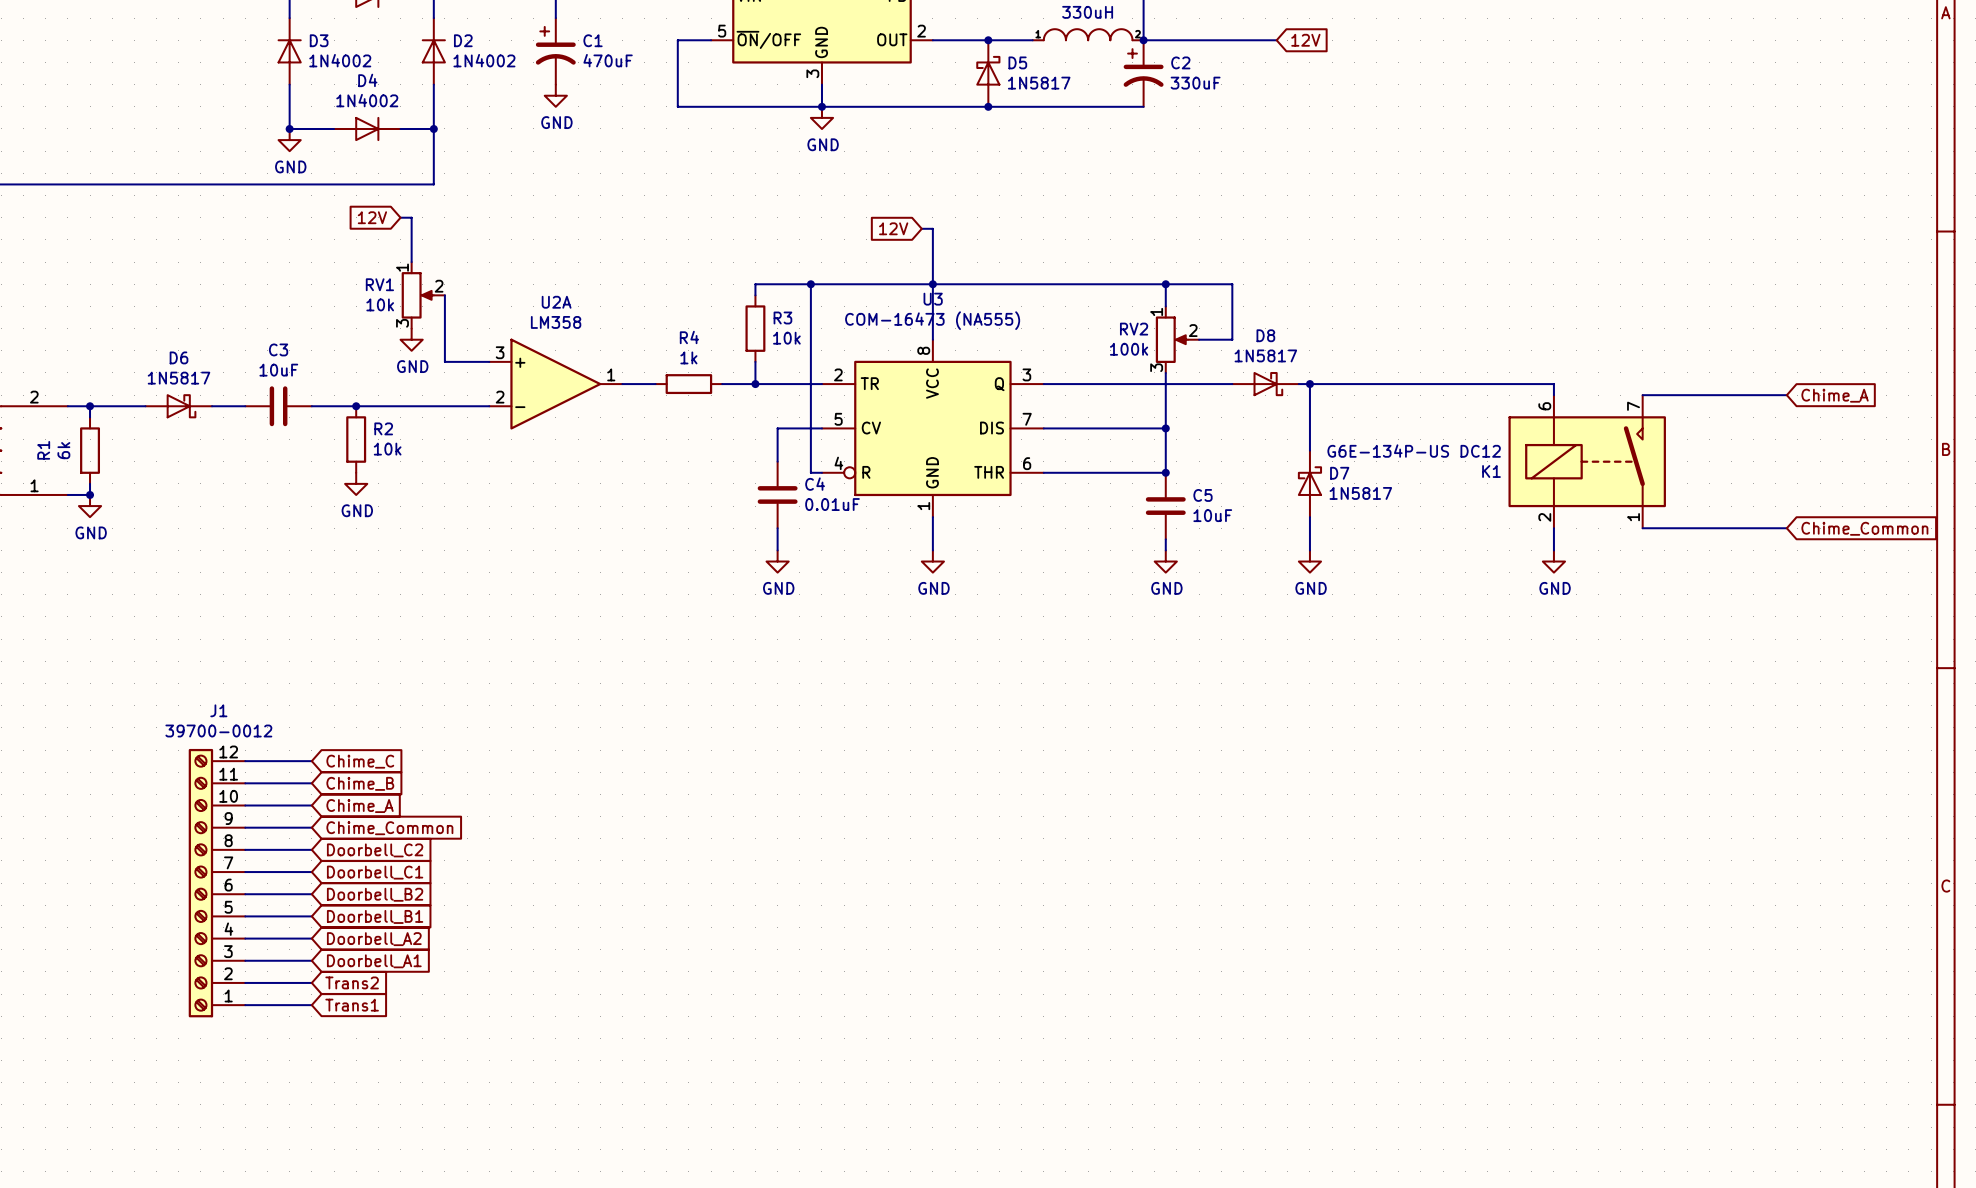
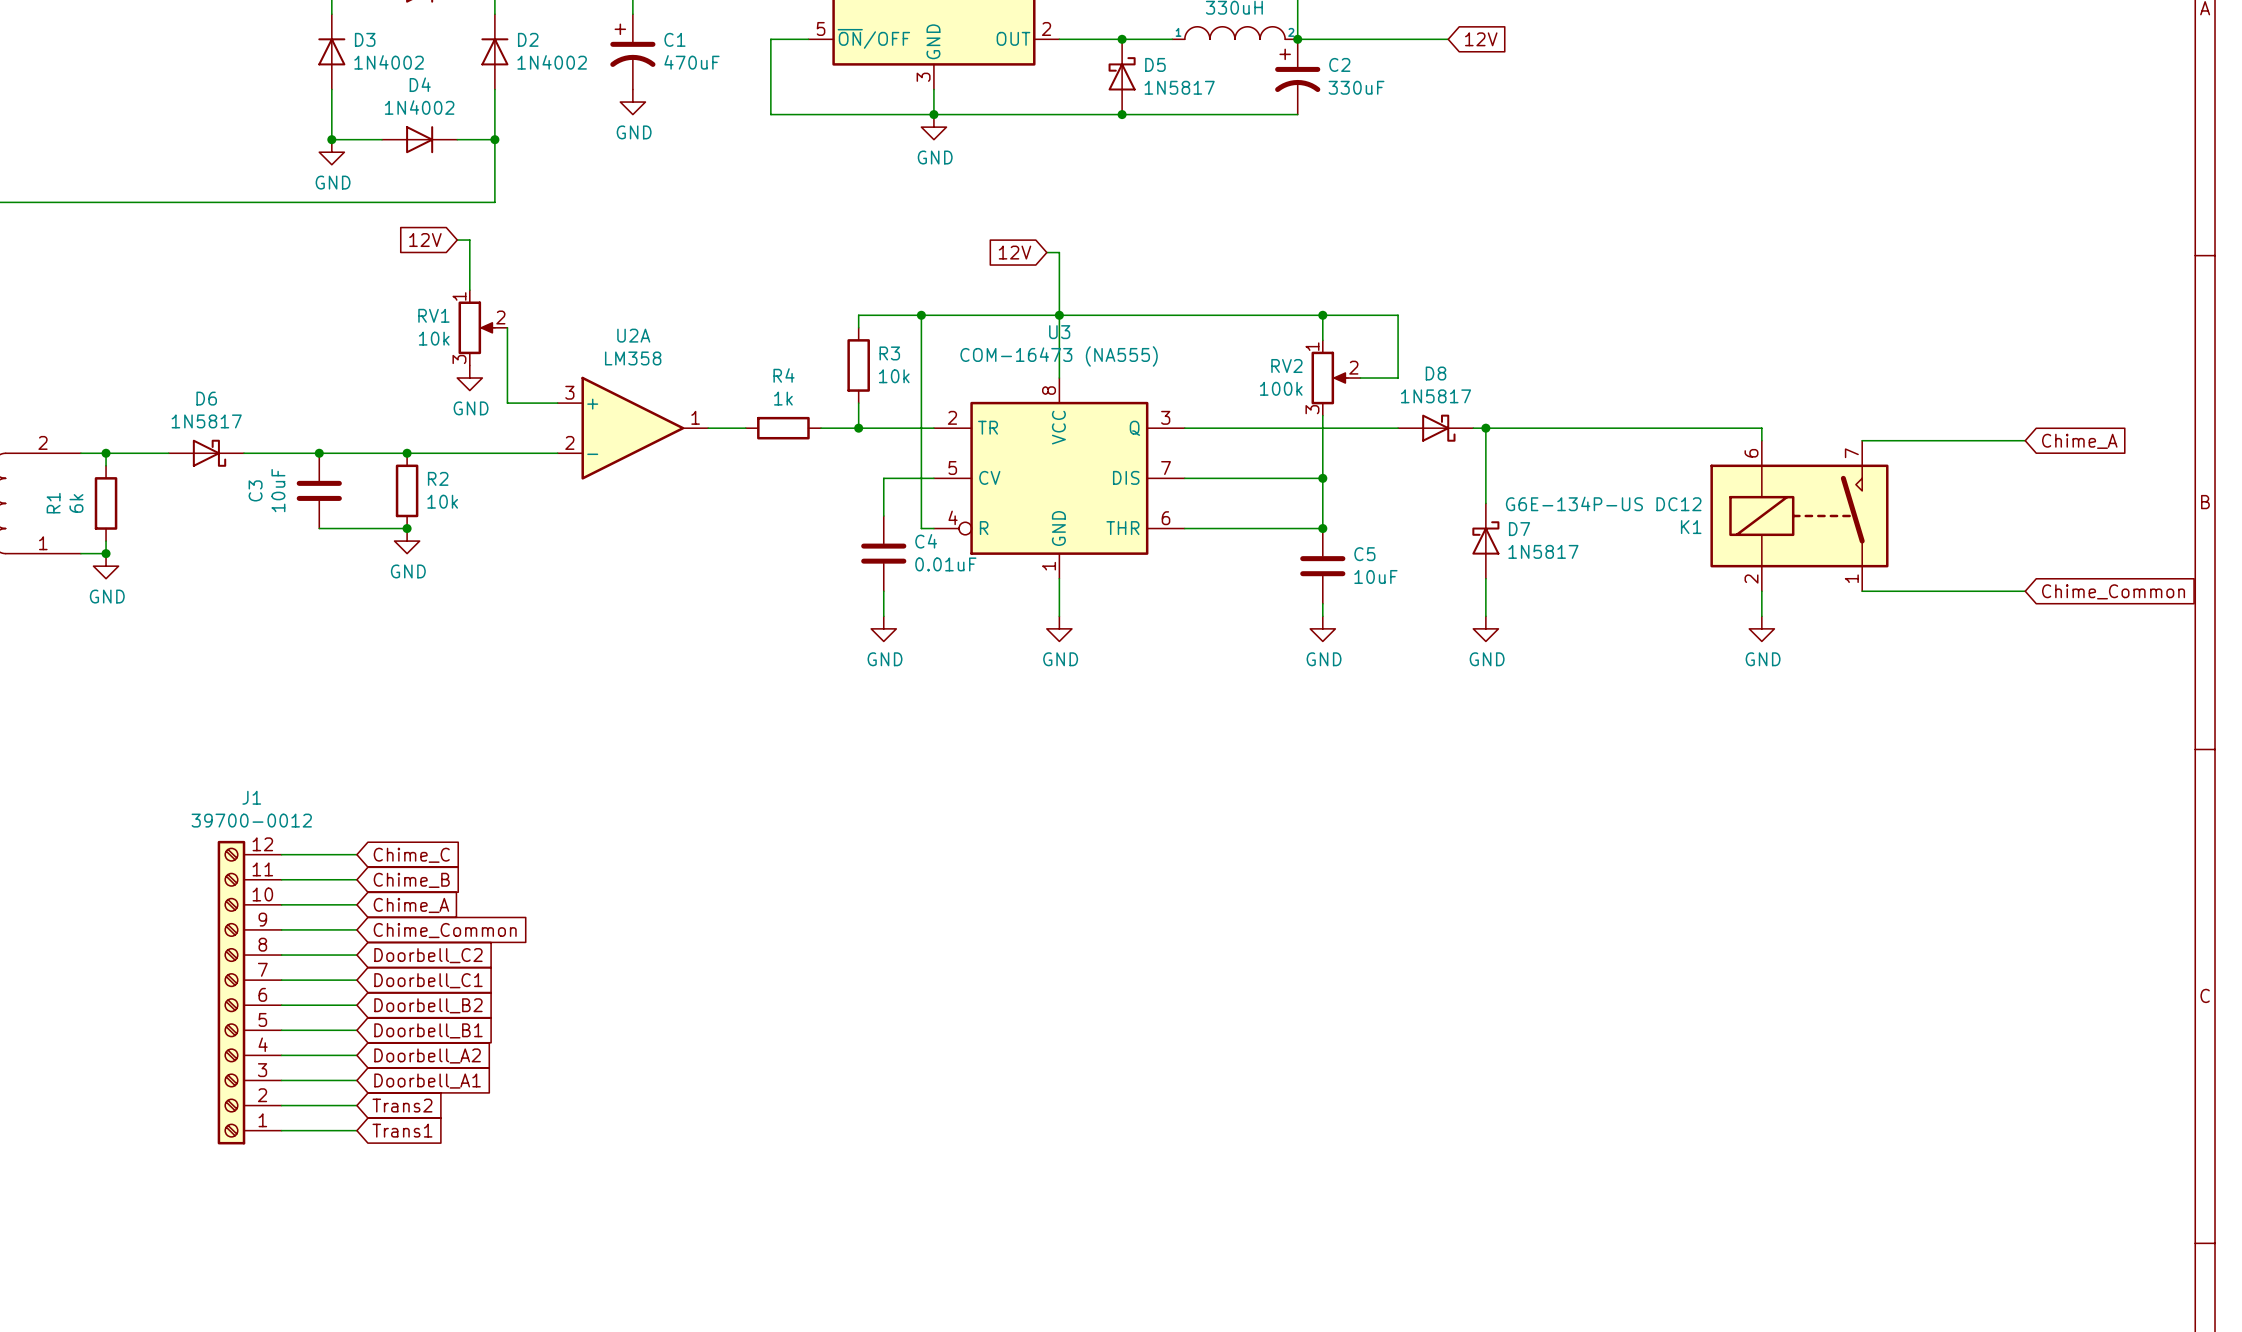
C3 name position: C3 (278, 349) -> C3 (255, 490)
C3 value position: 10uF (278, 370) -> 10uF (278, 490)
C3 rotation: 0° (278, 406) -> 90° clockwise (319, 490)
junction: none -> (319, 453)
wire: none -> (319, 528) (407, 528)
junction: none -> (407, 528)

